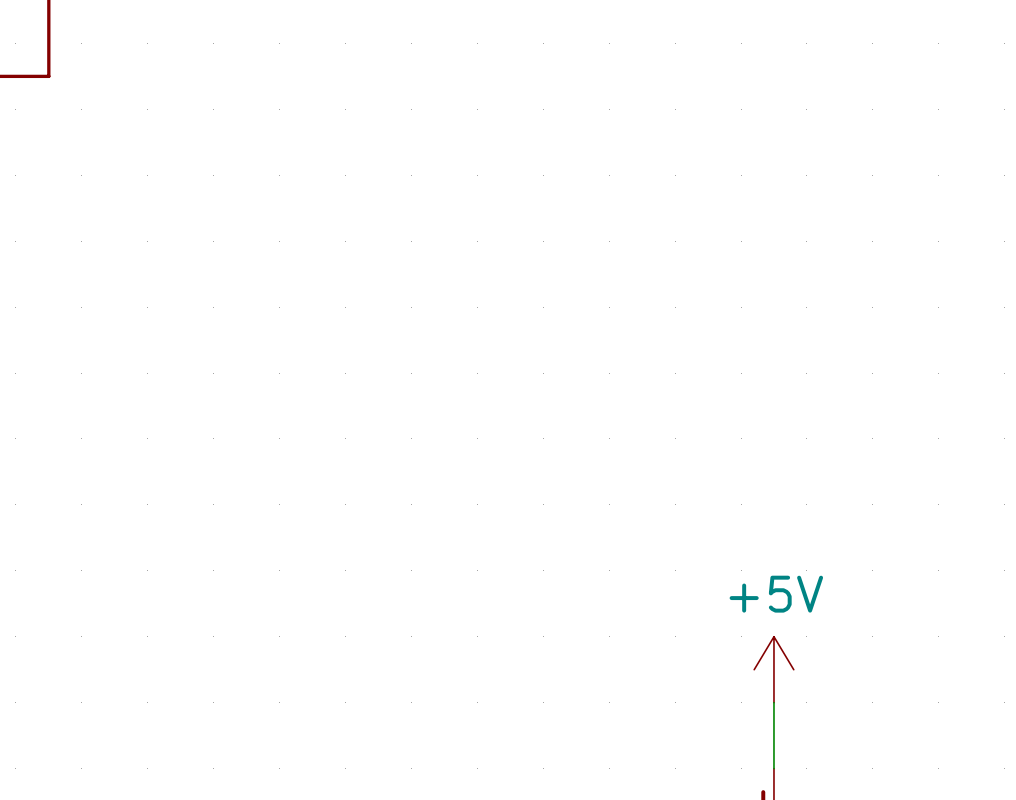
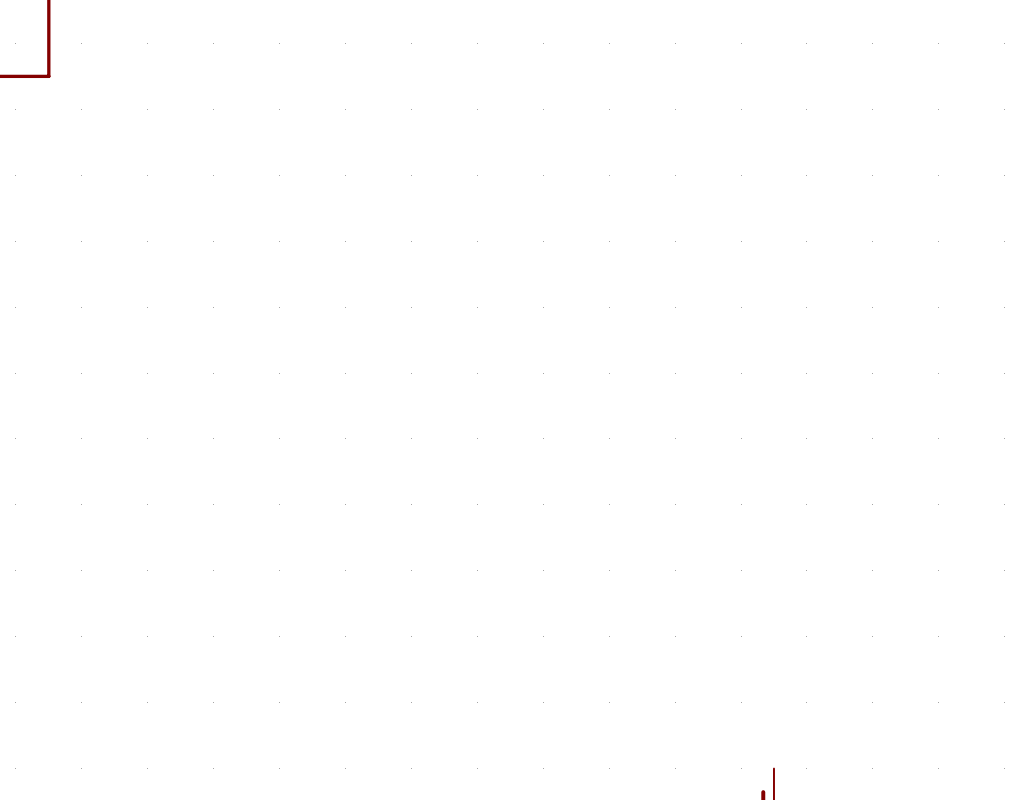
power symbol: +5V (773, 669) -> none
wire: (773, 702) (773, 768) -> none

